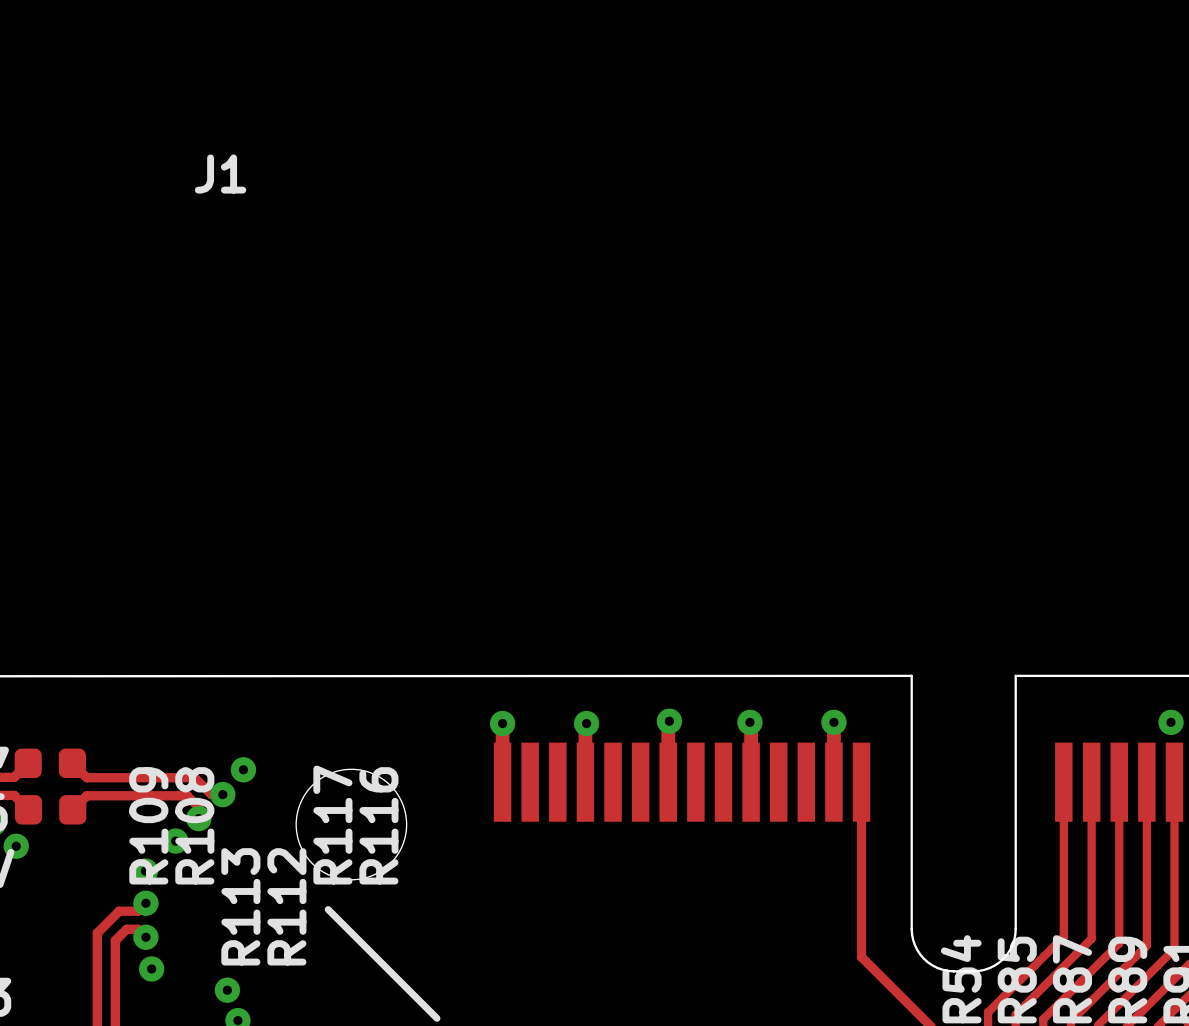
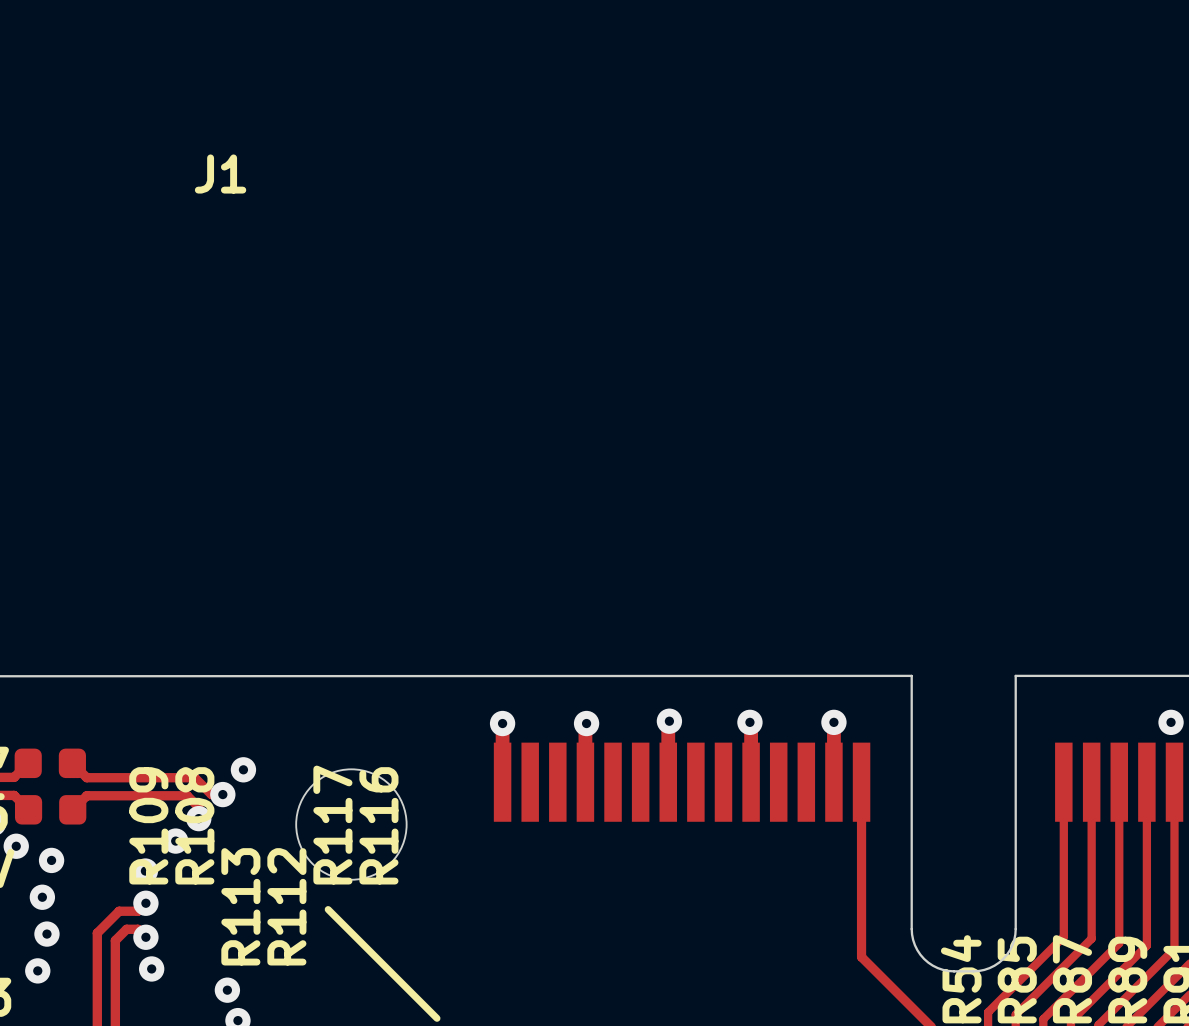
via: none -> (51, 860)
via: none -> (42, 897)
via: none -> (46, 934)
via: none -> (37, 970)

